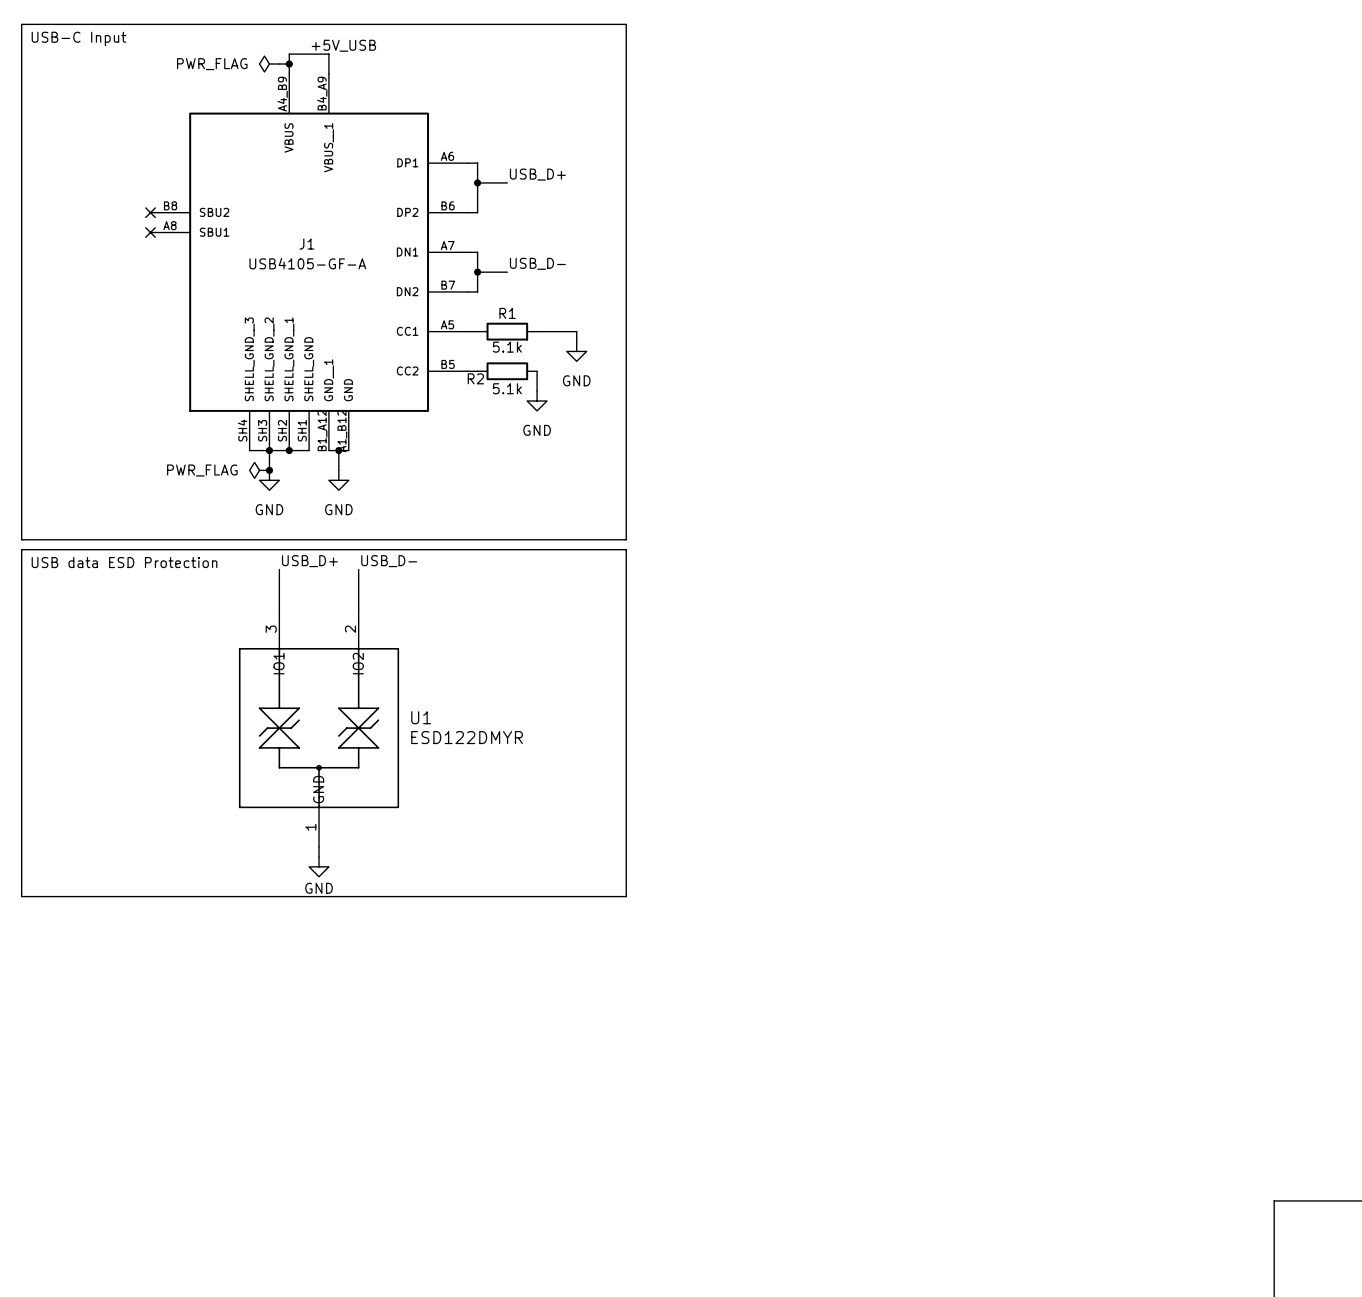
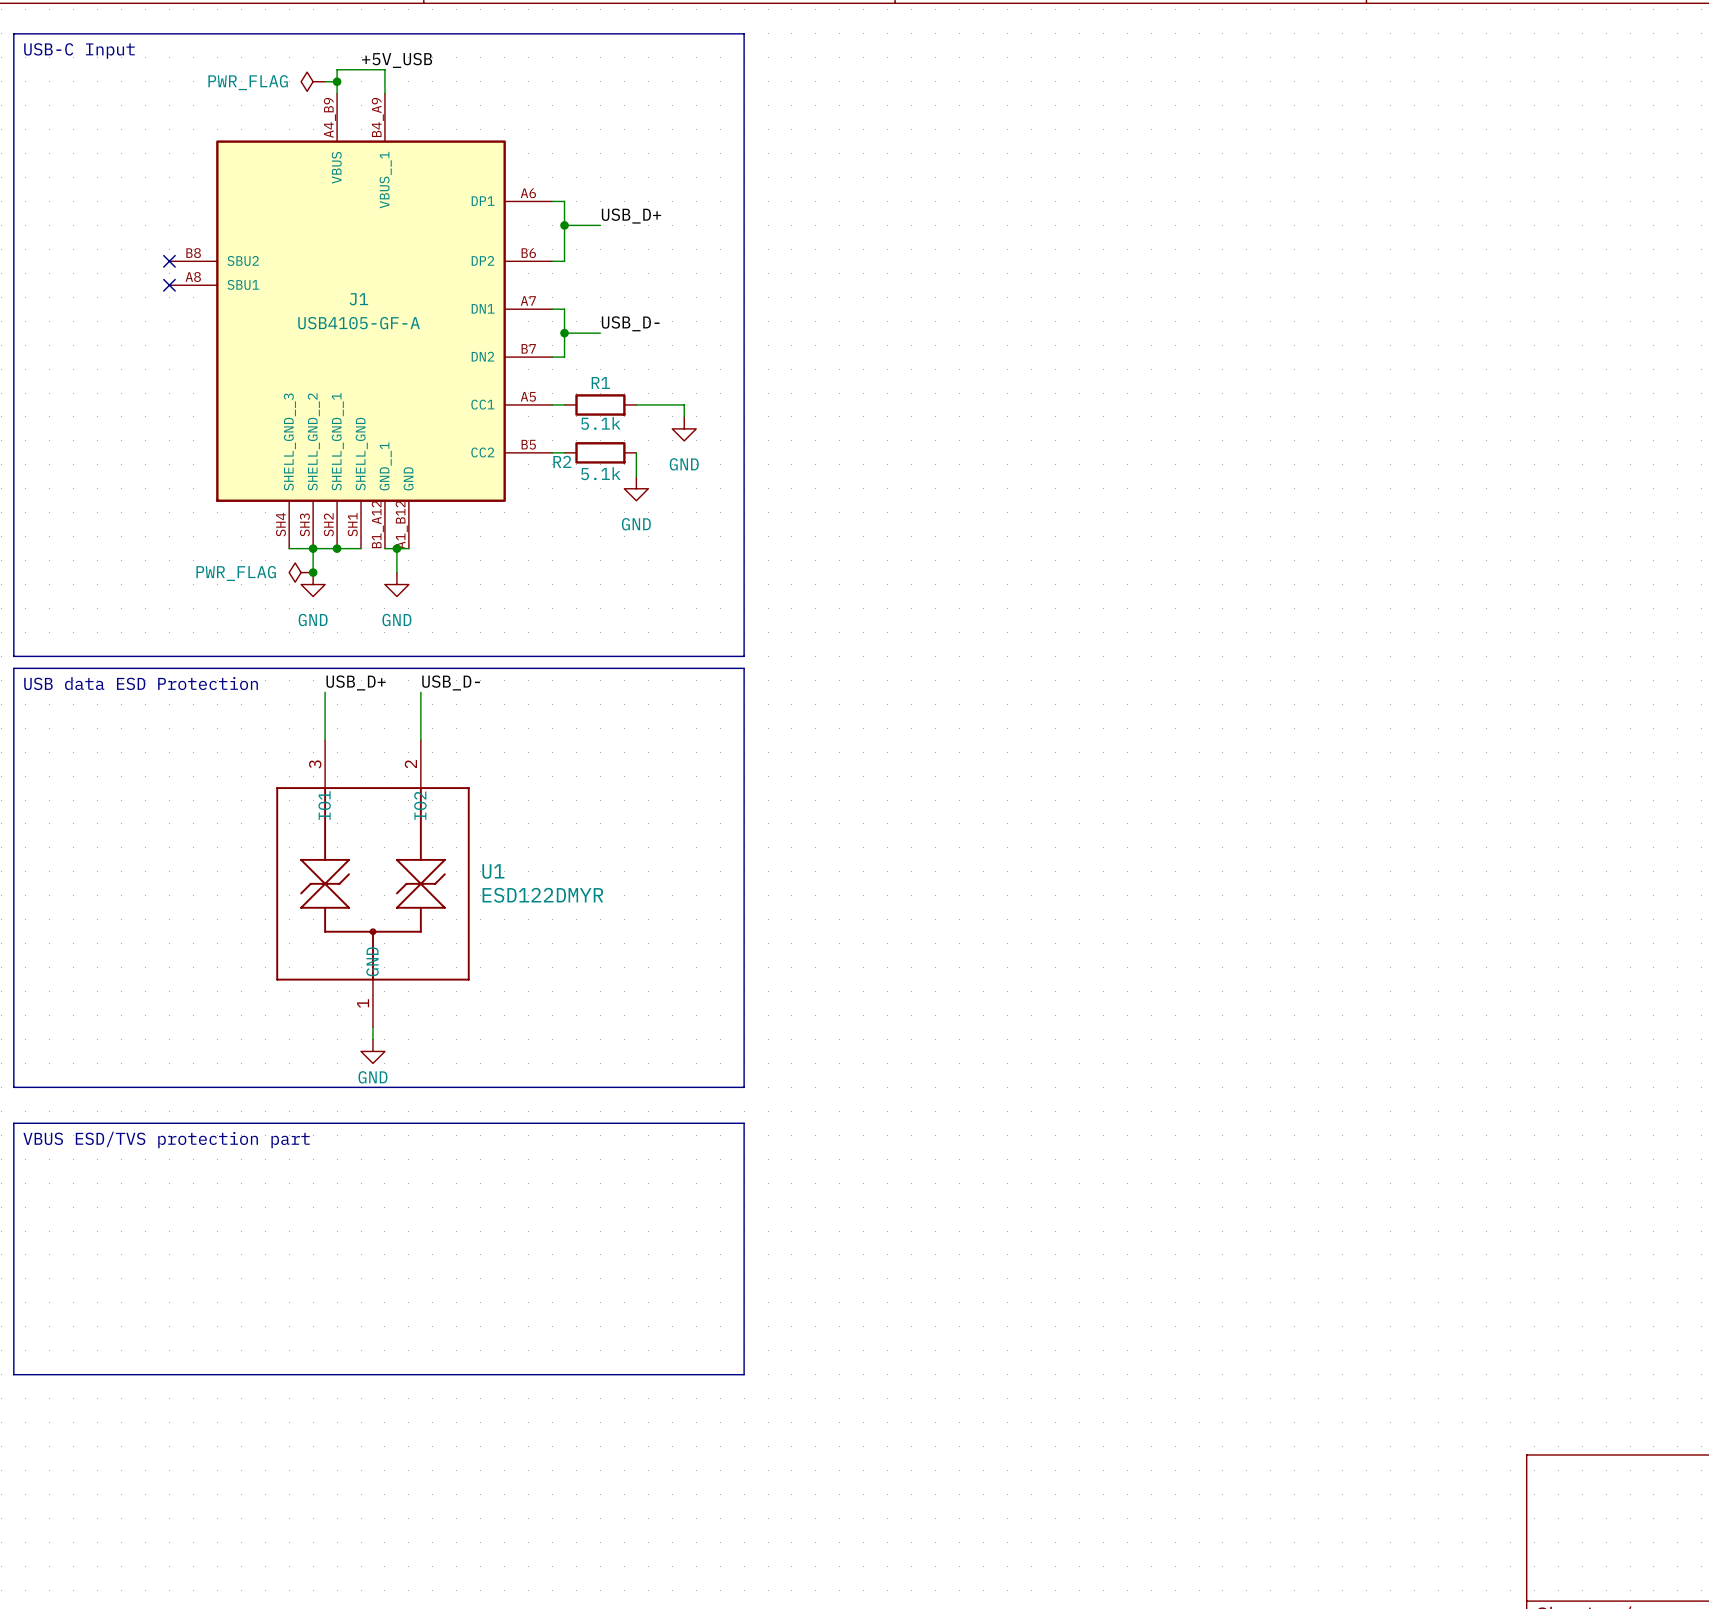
line: none -> (13, 1123) (744, 1123) (744, 1374) (13, 1374) (13, 1123)
text: none -> VBUS ESD/TVS protection part (166, 1139)

